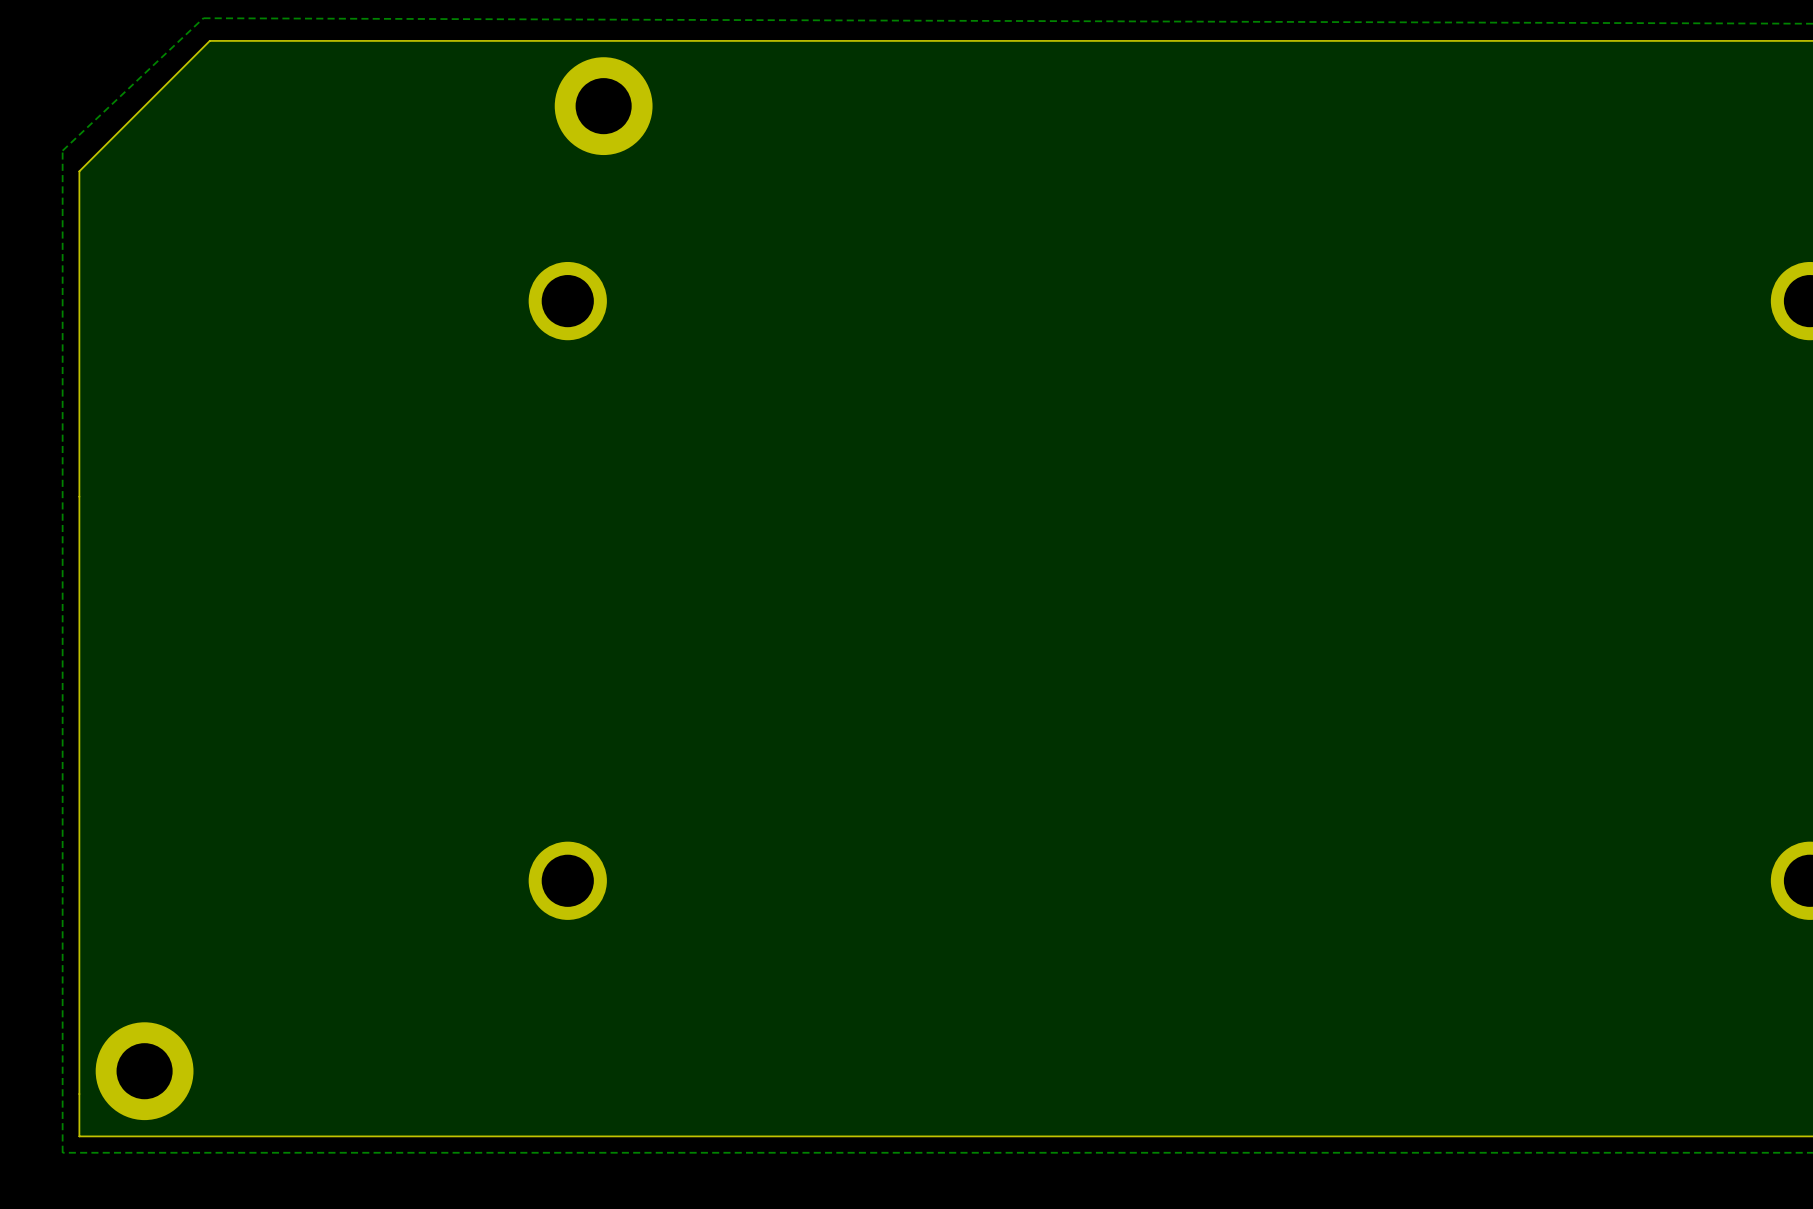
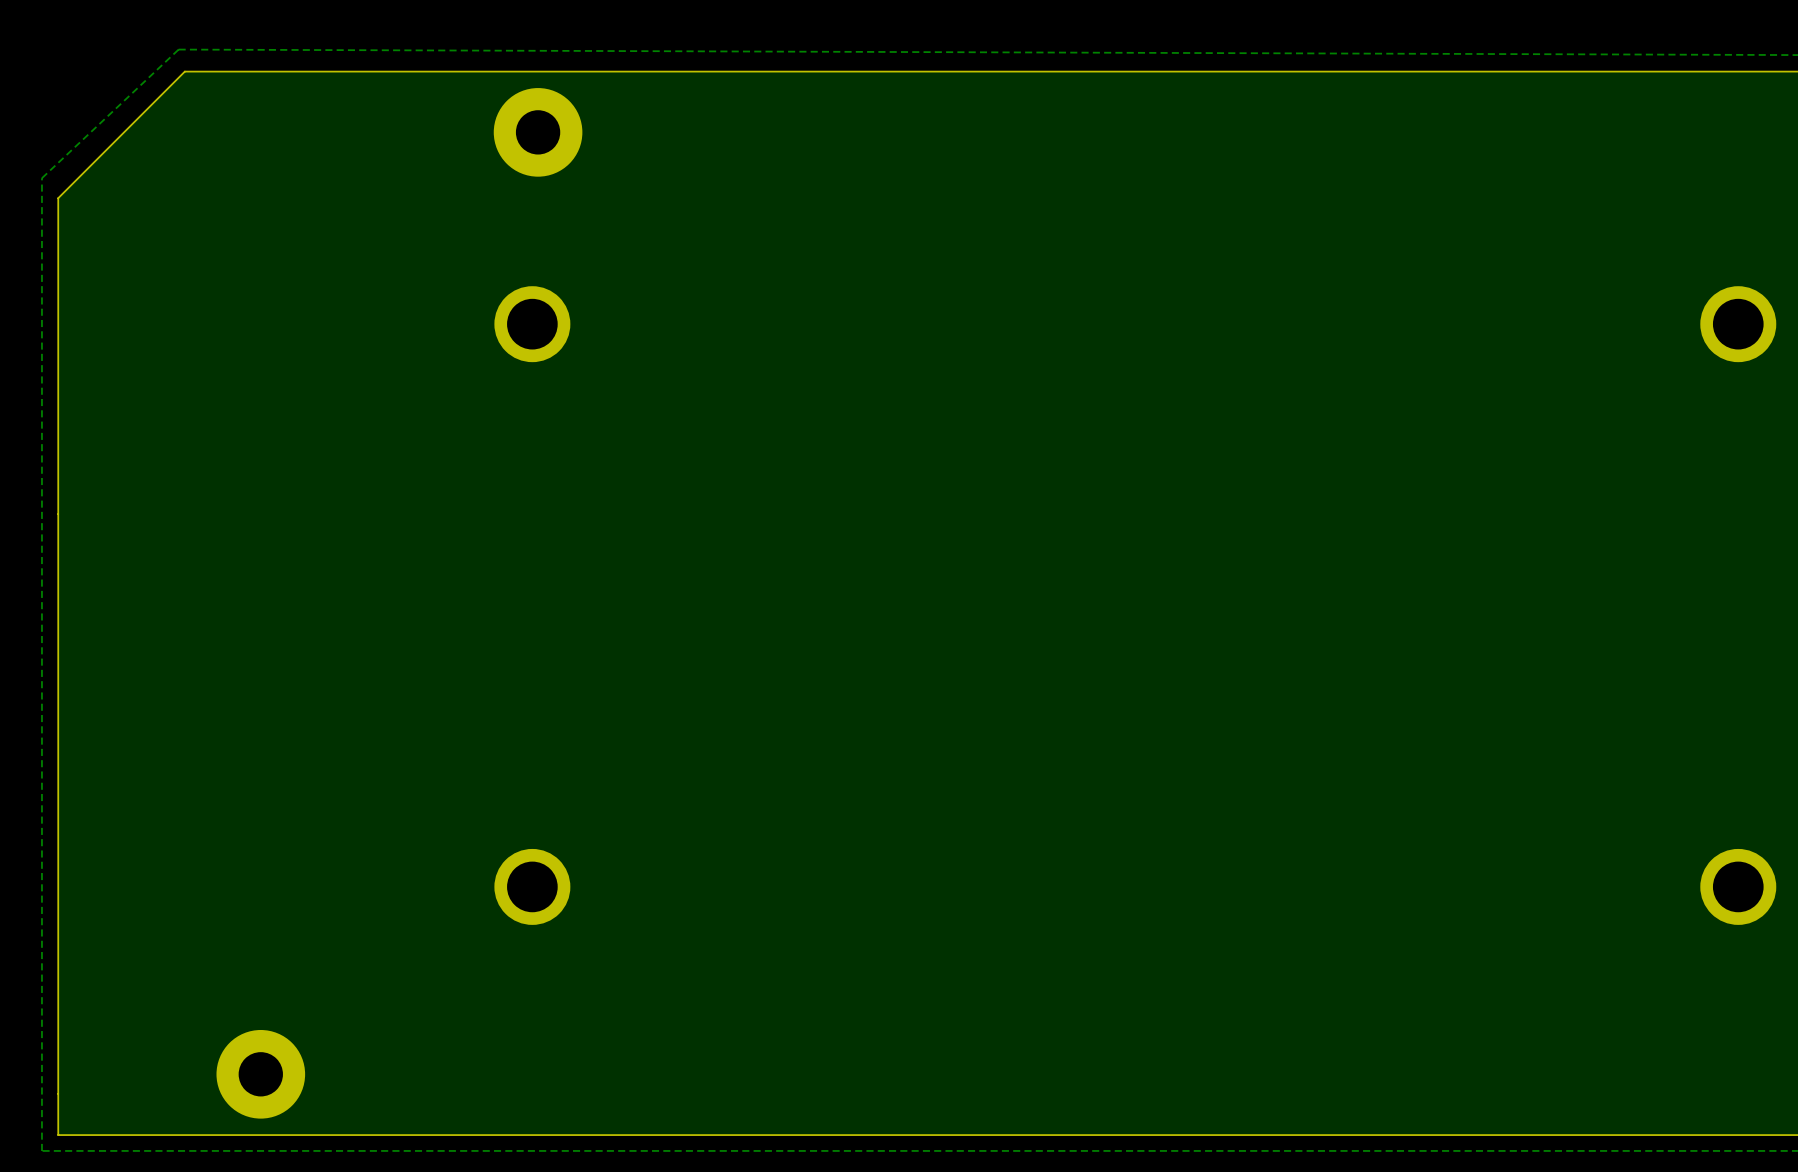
part: none -> (538, 132)
part: (603, 106) -> none
part: (144, 1071) -> none
part: none -> (260, 1074)

